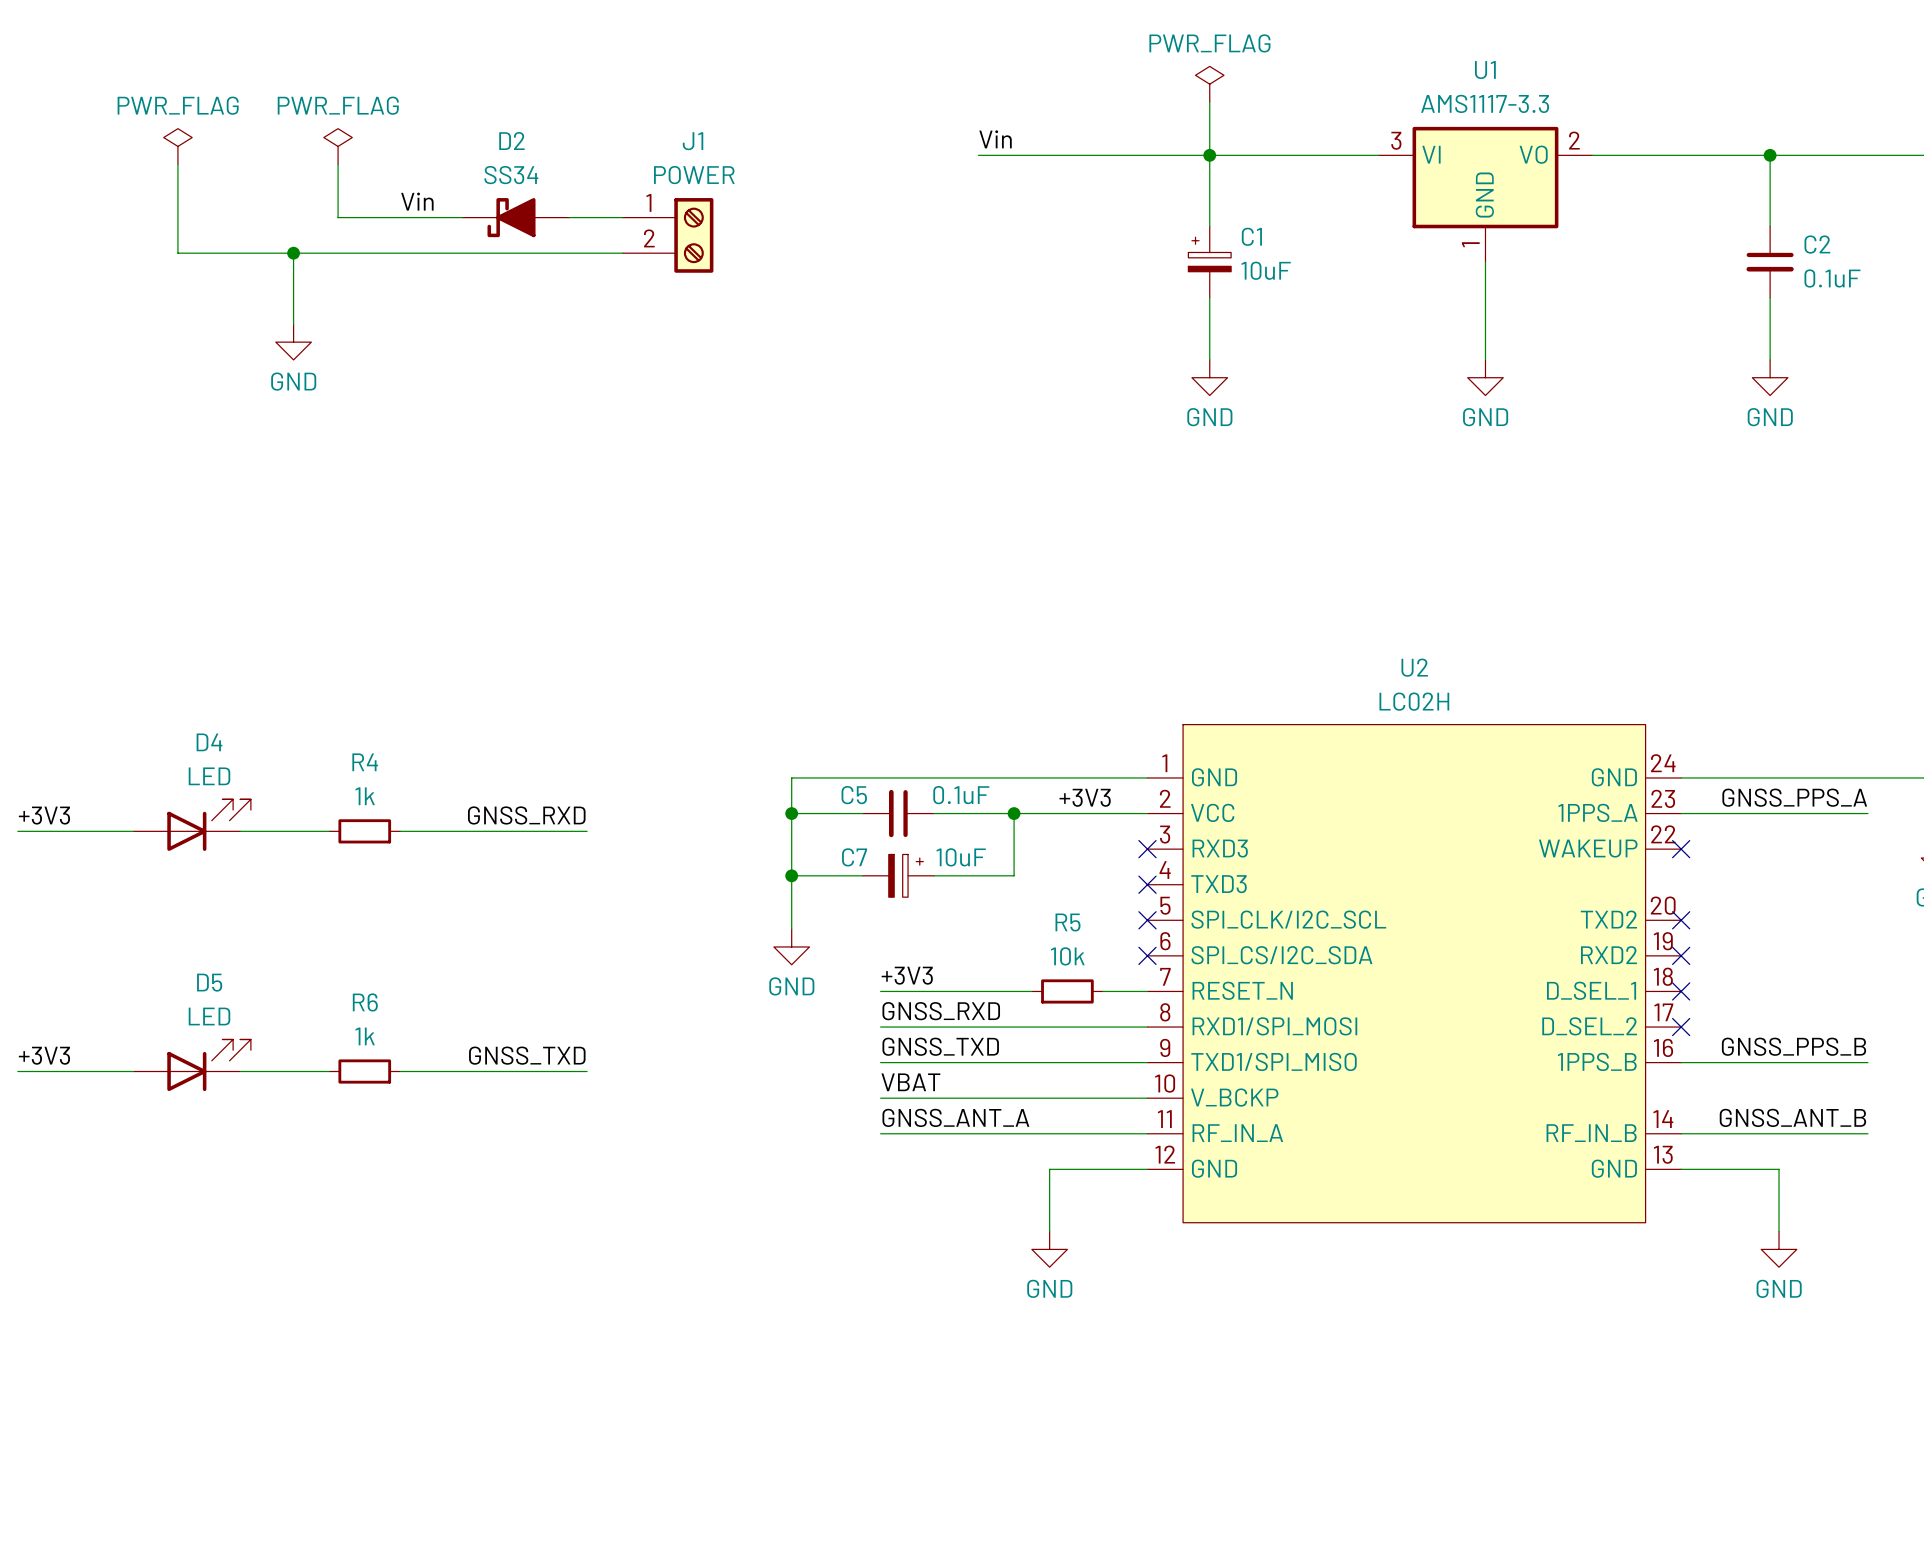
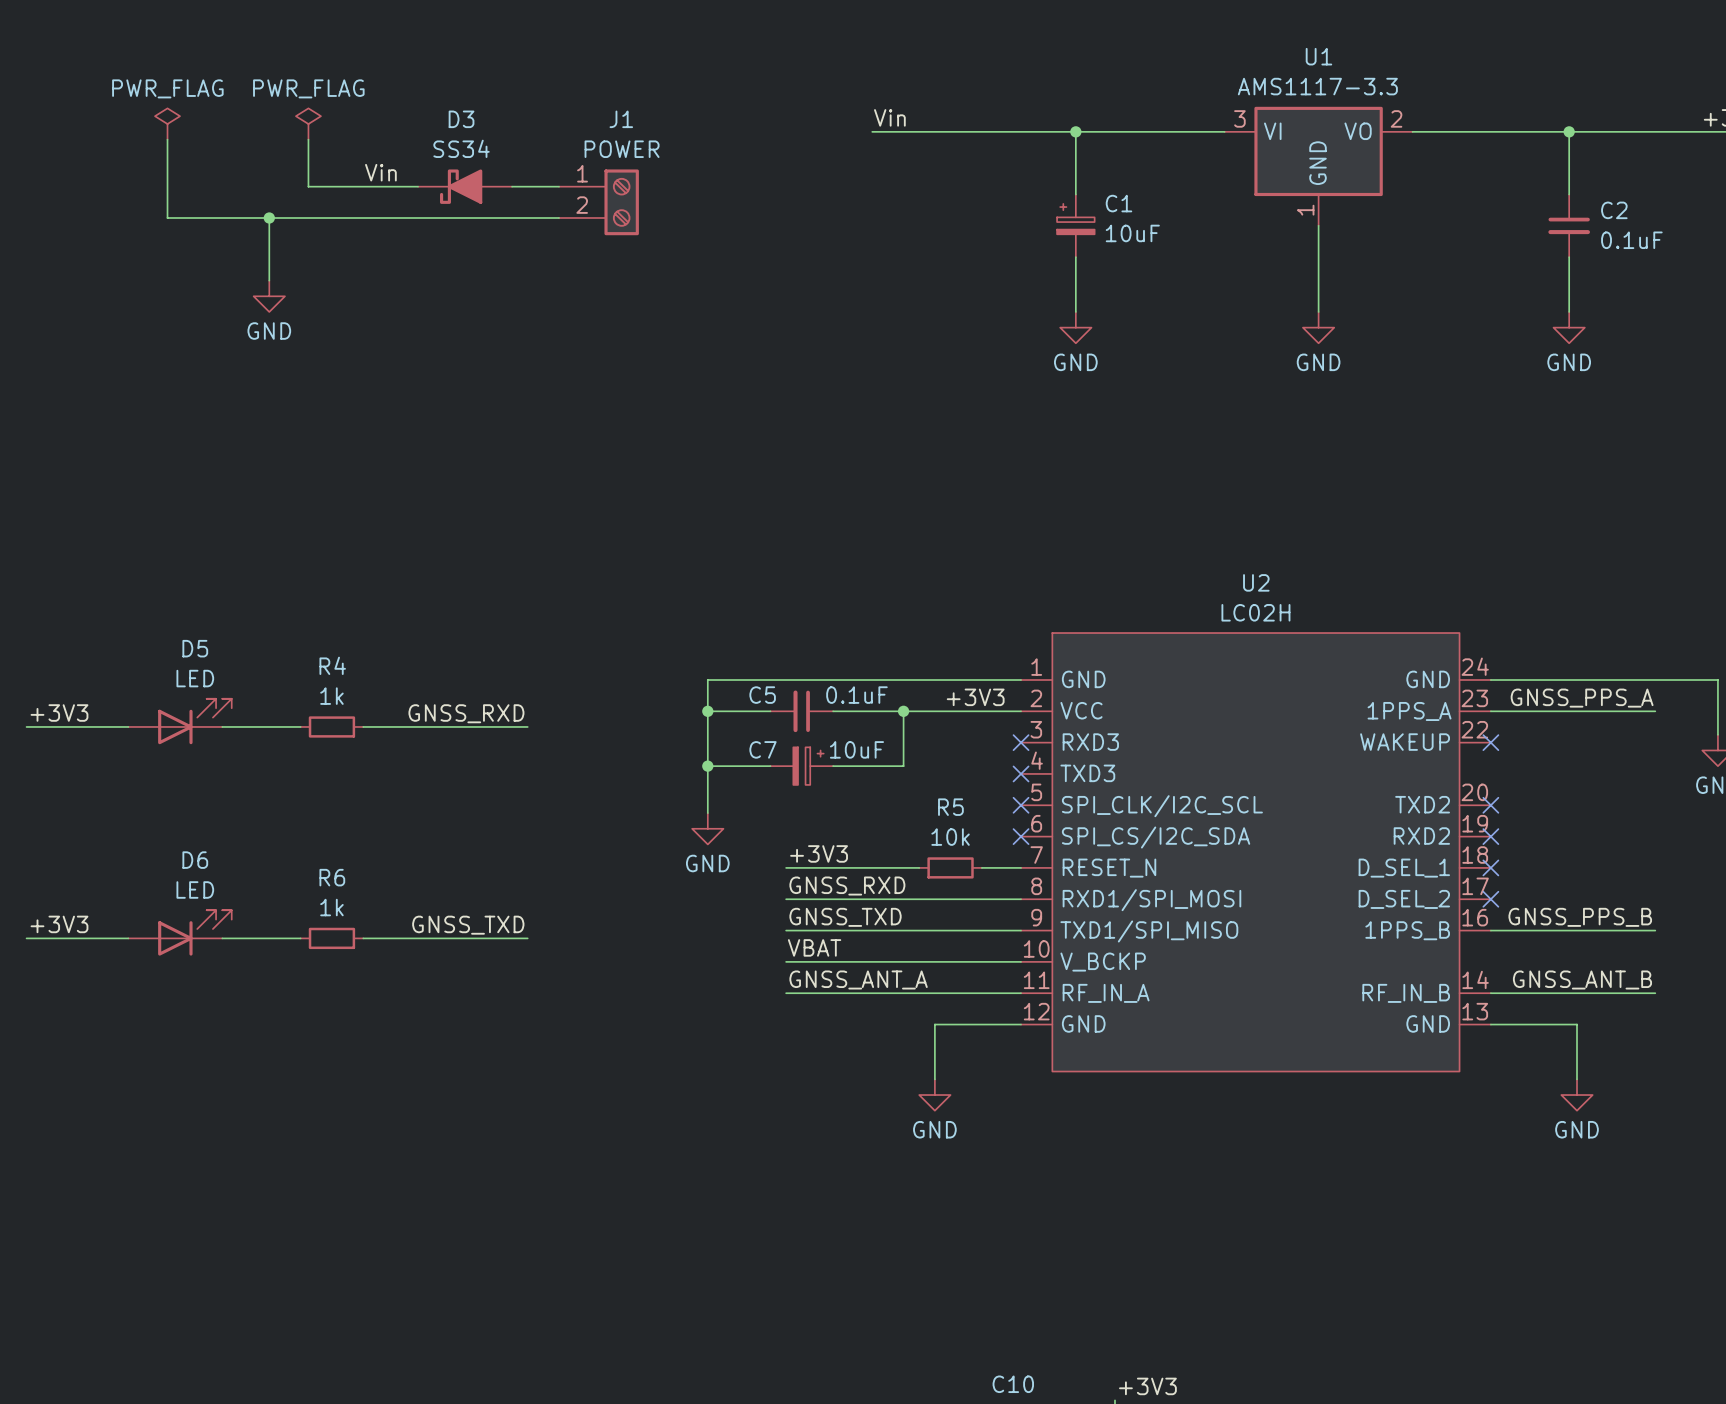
power symbol: PWR_FLAG (1209, 84) -> none
wire: (1209, 101) (1209, 155) -> none
D2 name: D2 (511, 141) -> D3 (461, 119)
D4 name: D4 (209, 742) -> D5 (195, 648)
D5 name: D5 (209, 982) -> D6 (195, 860)

